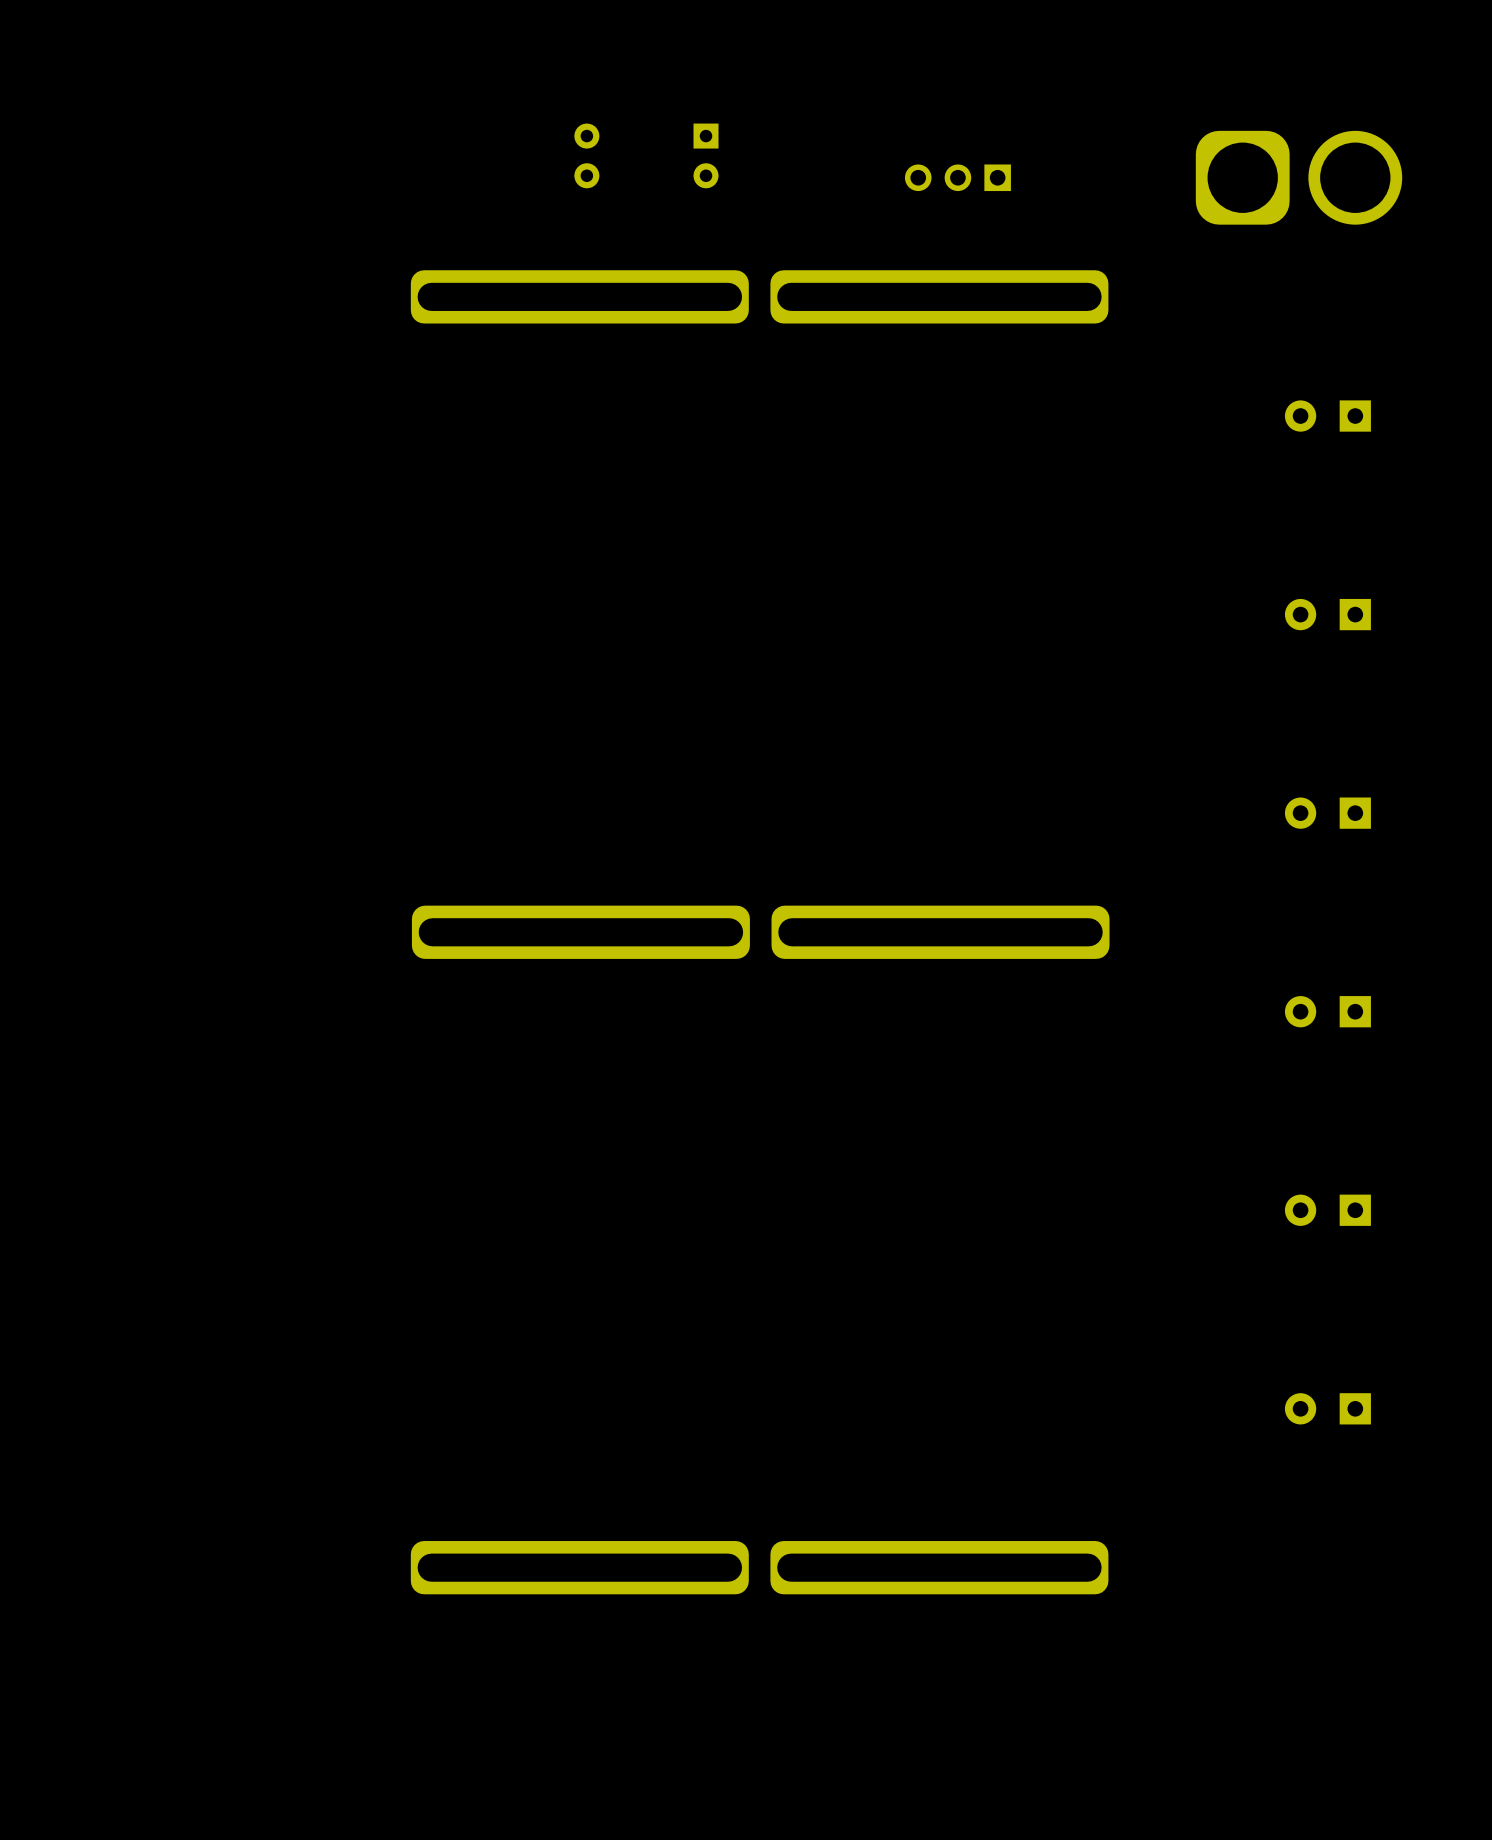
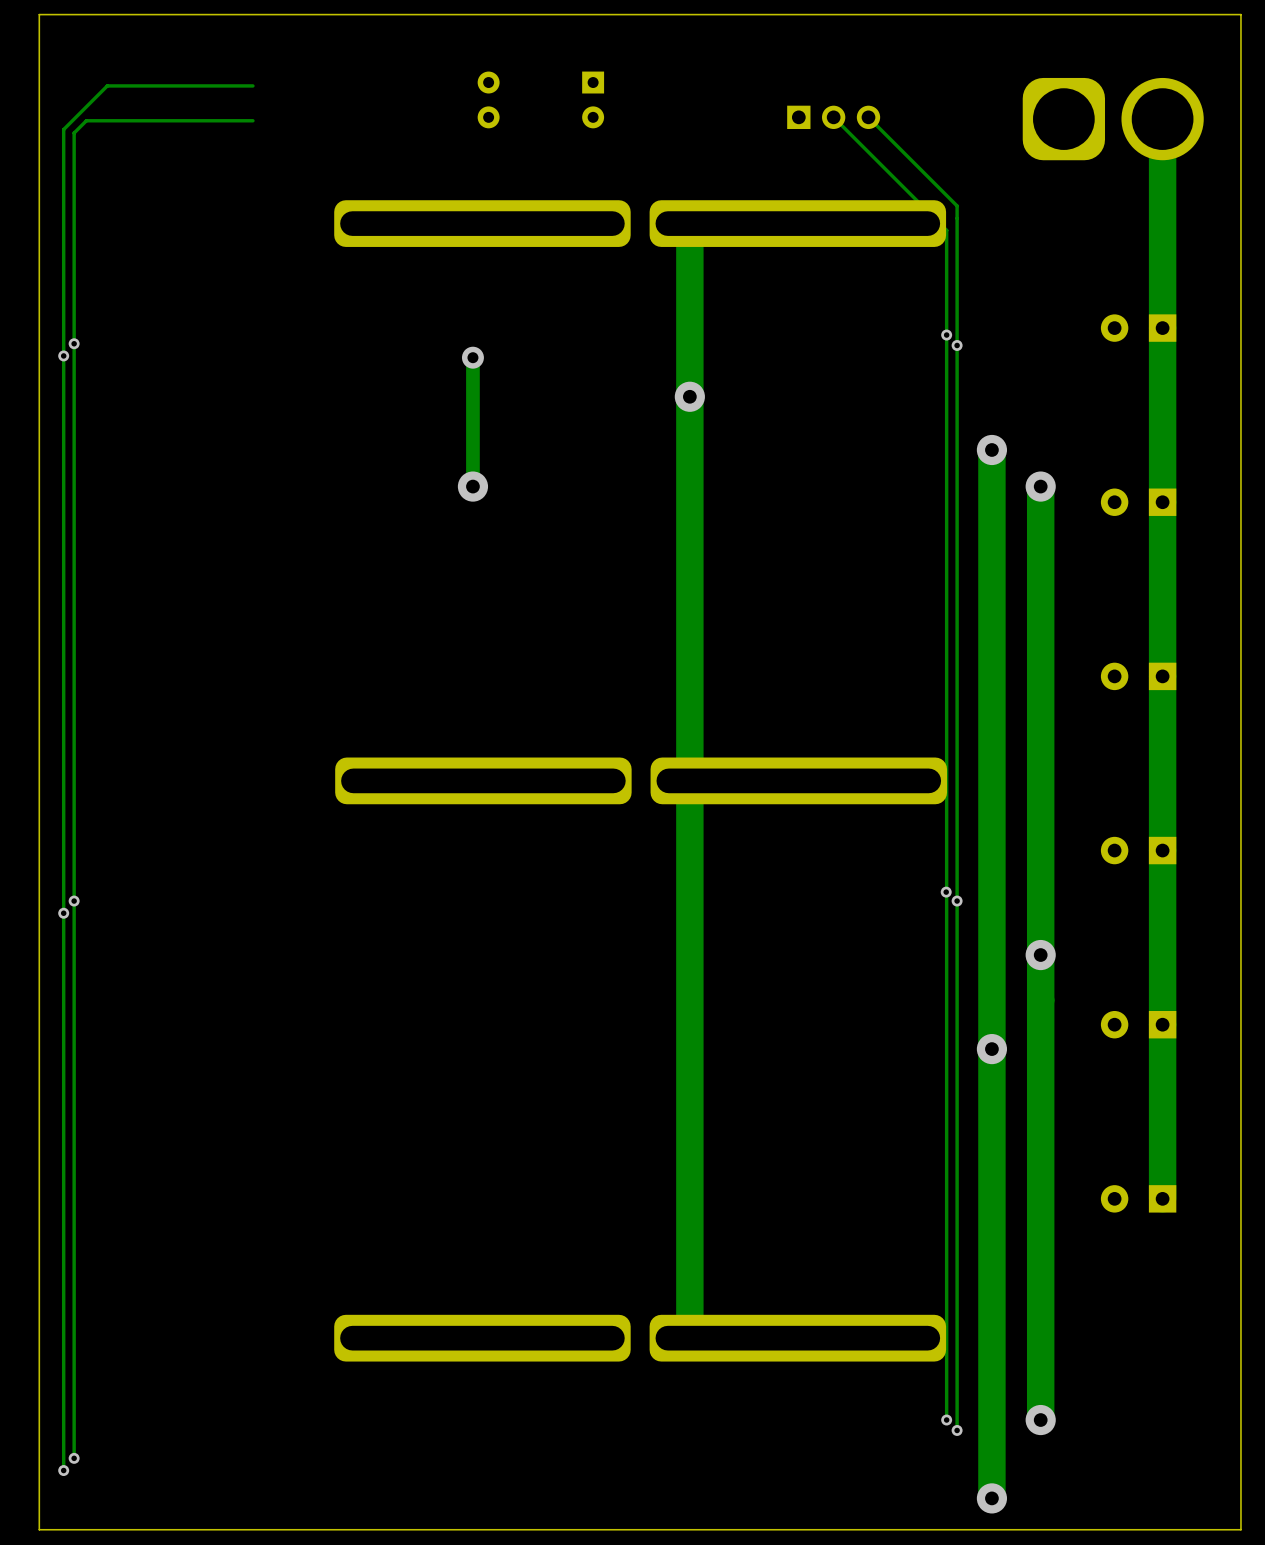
board edge: none -> (1240, 14) (39, 14) (39, 1529) (1240, 1529) (1240, 14)
track: none -> (252, 85) (107, 85) (63, 129) (63, 1470)
track: none -> (833, 117) (946, 230) (946, 1420)
track: none -> (868, 117) (957, 205) (957, 1430)
part rotation: 0° (957, 177) -> 180° (833, 117)
track: none -> (1162, 119) (1162, 1198)
track: none -> (252, 120) (86, 120) (74, 133) (74, 1458)
track: none -> (689, 221) (689, 1336)
via: none -> (946, 335)
via: none -> (74, 343)
via: none -> (957, 345)
via: none -> (63, 355)
track: none -> (472, 357) (472, 486)
via: none -> (472, 357)
via: none -> (689, 396)
track: none -> (991, 449) (991, 1498)
via: none -> (991, 449)
via: none -> (472, 486)
track: none -> (1040, 486) (1040, 1420)
via: none -> (1040, 486)
via: none -> (946, 892)
via: none -> (74, 901)
via: none -> (957, 901)
via: none -> (63, 913)
via: none -> (1040, 955)
via: none -> (991, 1049)
via: none -> (946, 1420)
via: none -> (1040, 1420)
via: none -> (957, 1430)
via: none -> (74, 1458)
via: none -> (63, 1470)
via: none -> (991, 1498)

